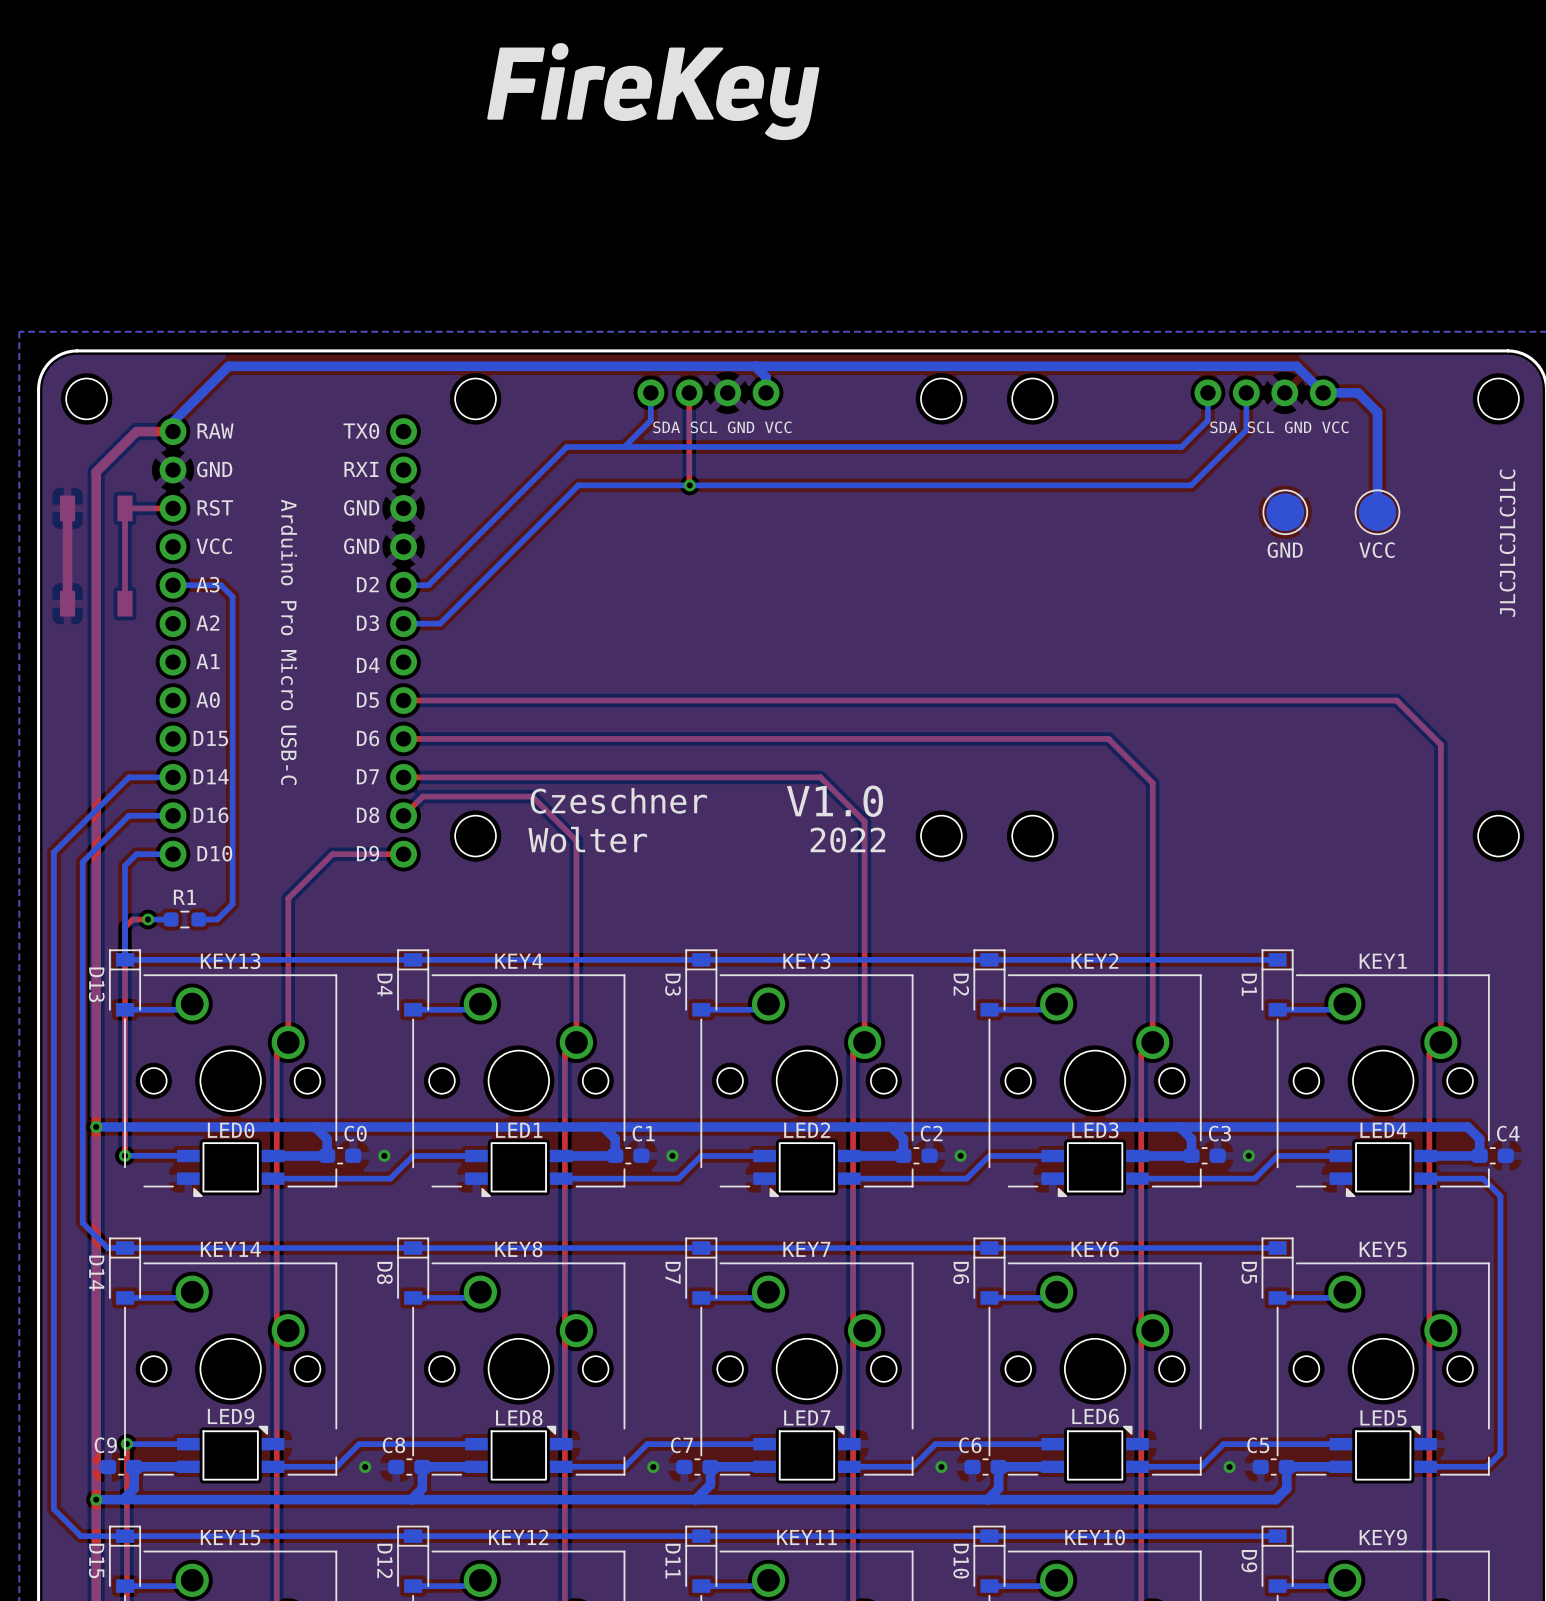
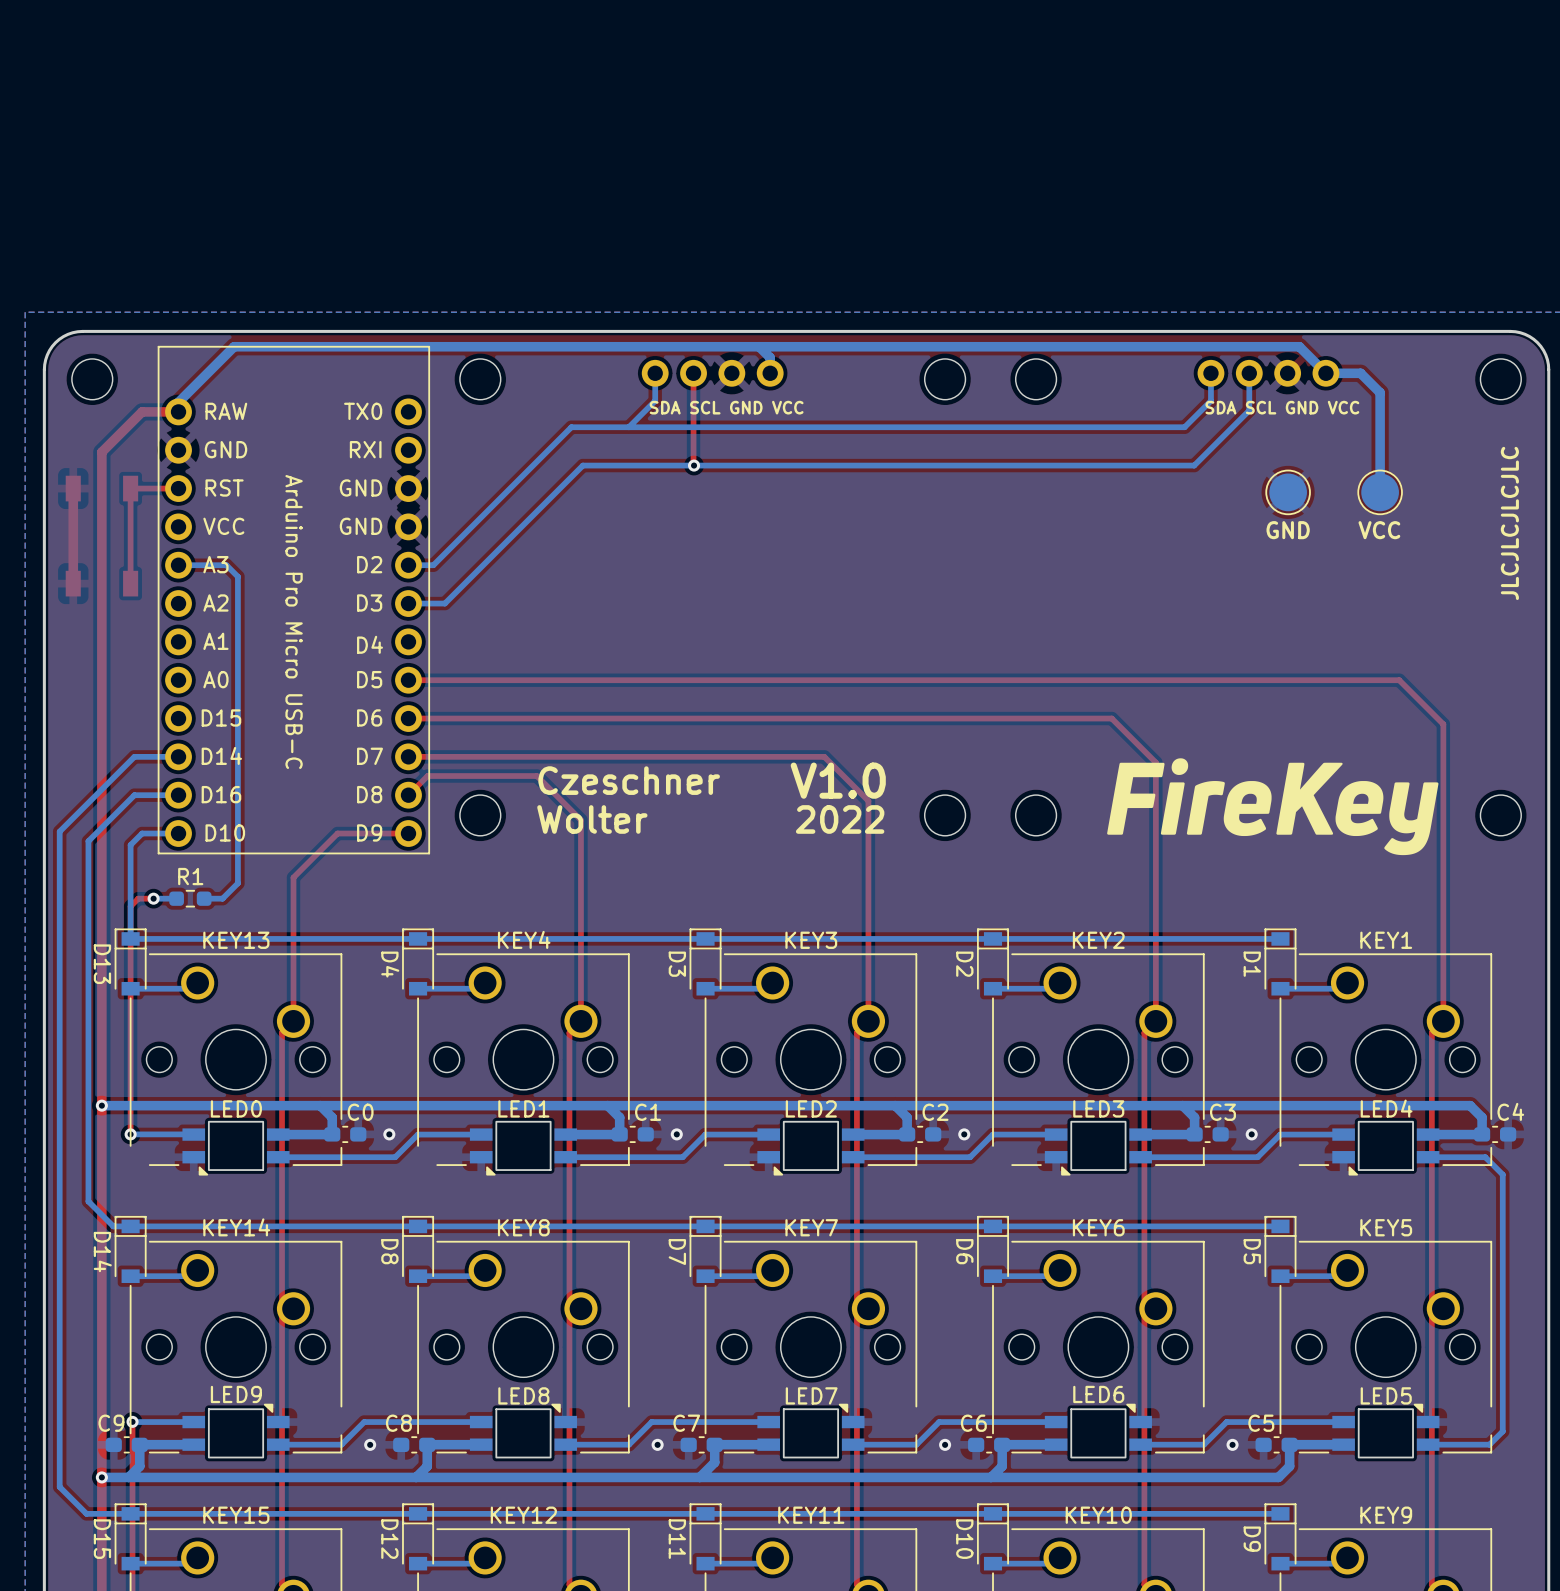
drawing: [487, 43, 820, 141] -> none
part: none -> (293, 600)
drawing: none -> [1107, 758, 1439, 856]

